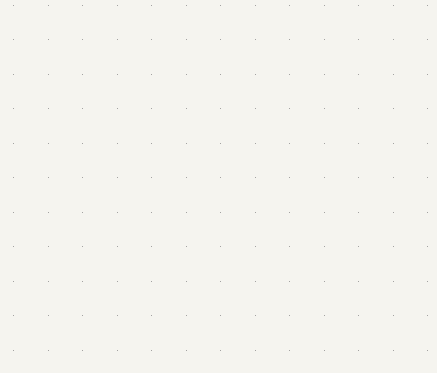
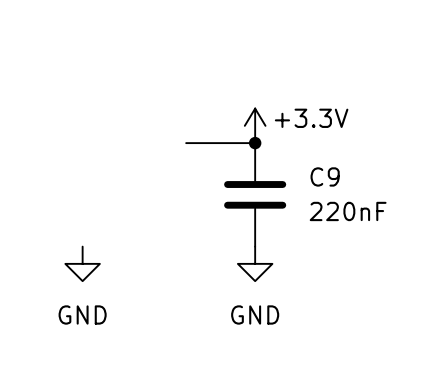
power symbol: none -> +3.3V (255, 125)
wire: none -> (186, 143) (255, 143)
junction: none -> (255, 143)
C9: none -> 220nF (255, 194)
power symbol: none -> GND (82, 263)
power symbol: none -> GND (255, 263)

